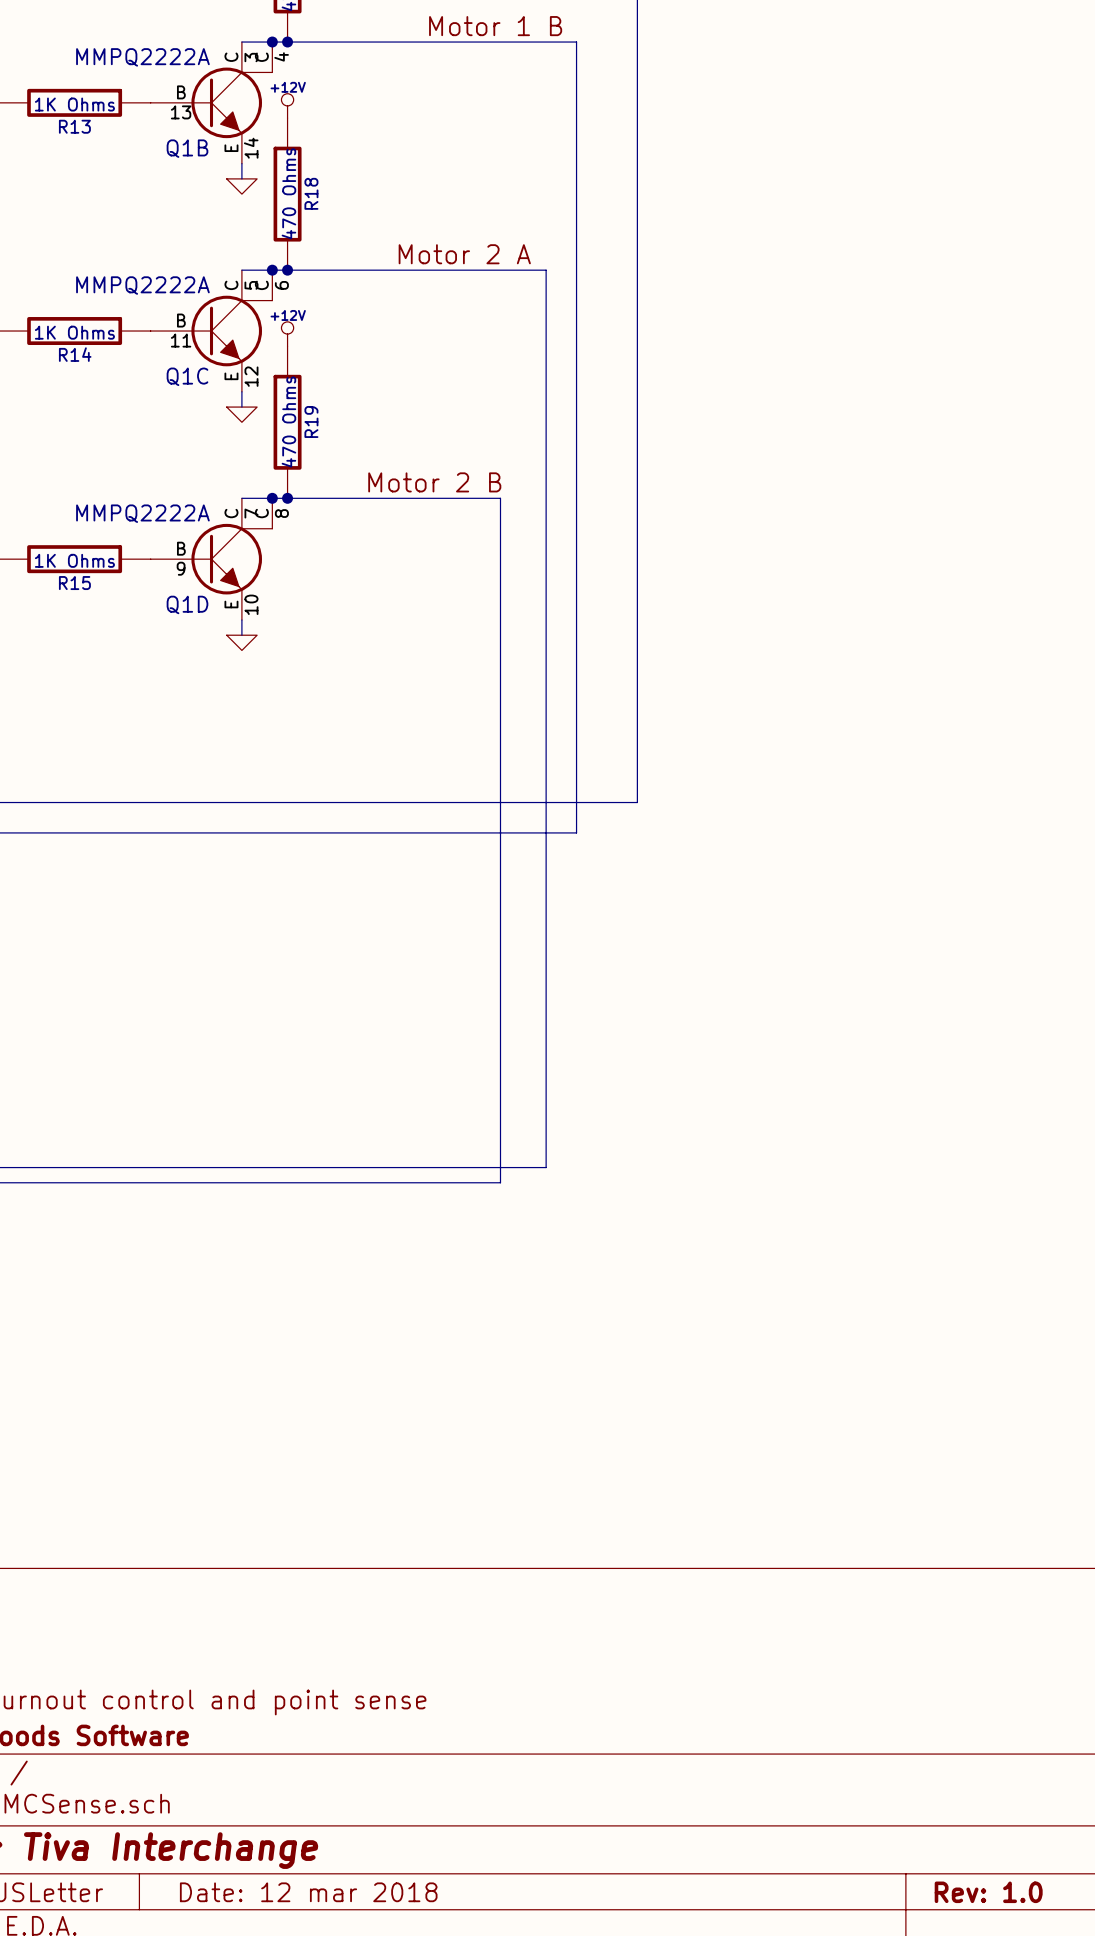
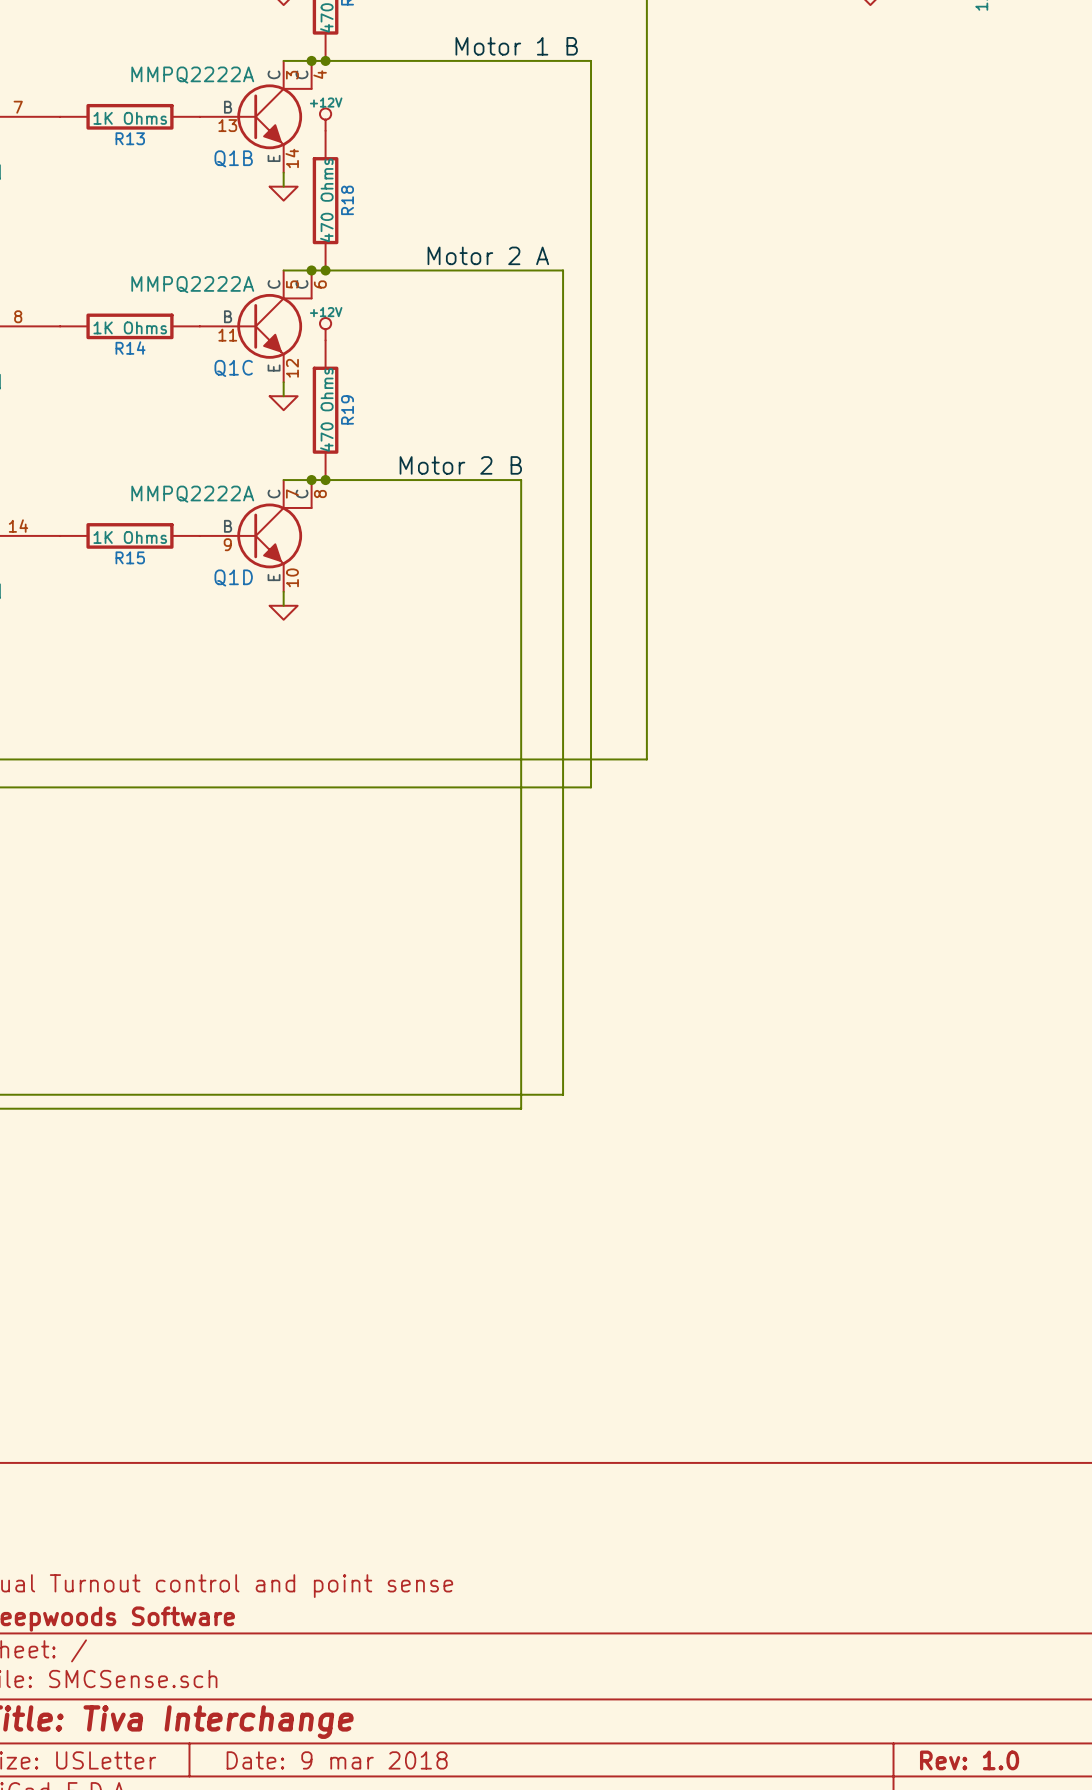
title block: Date: 12 mar 2018 (308, 1892) -> Date: 9 mar 2018 (337, 1760)

